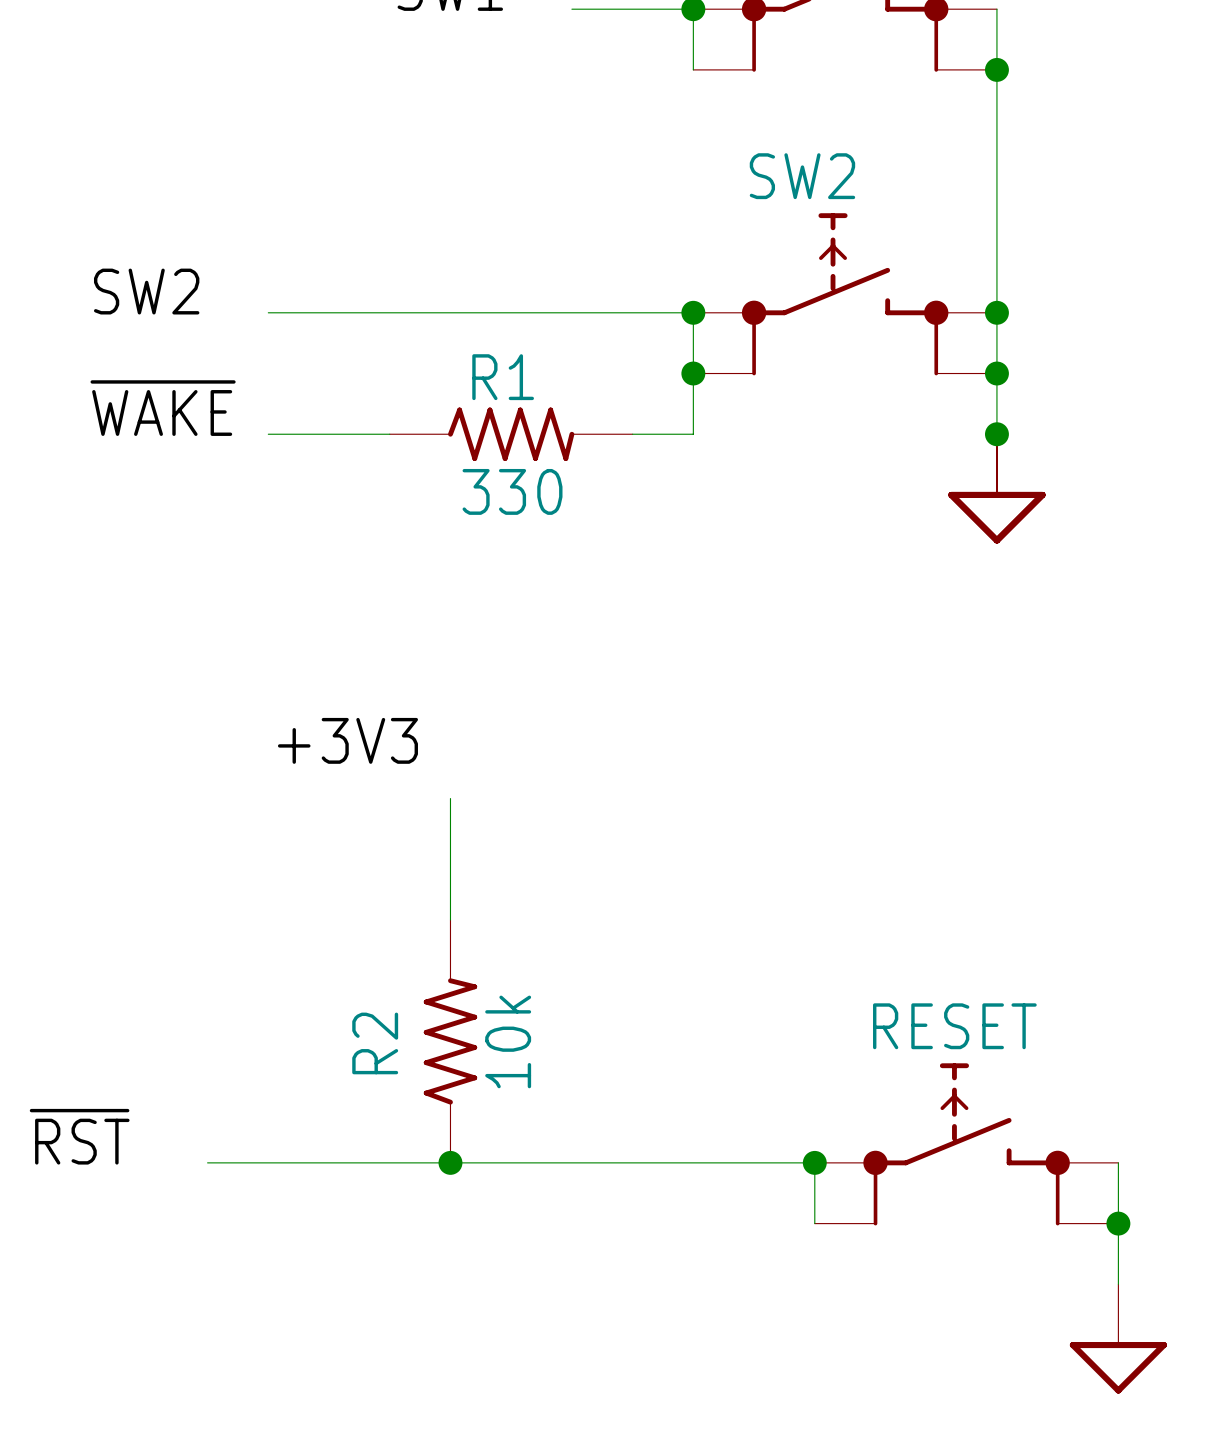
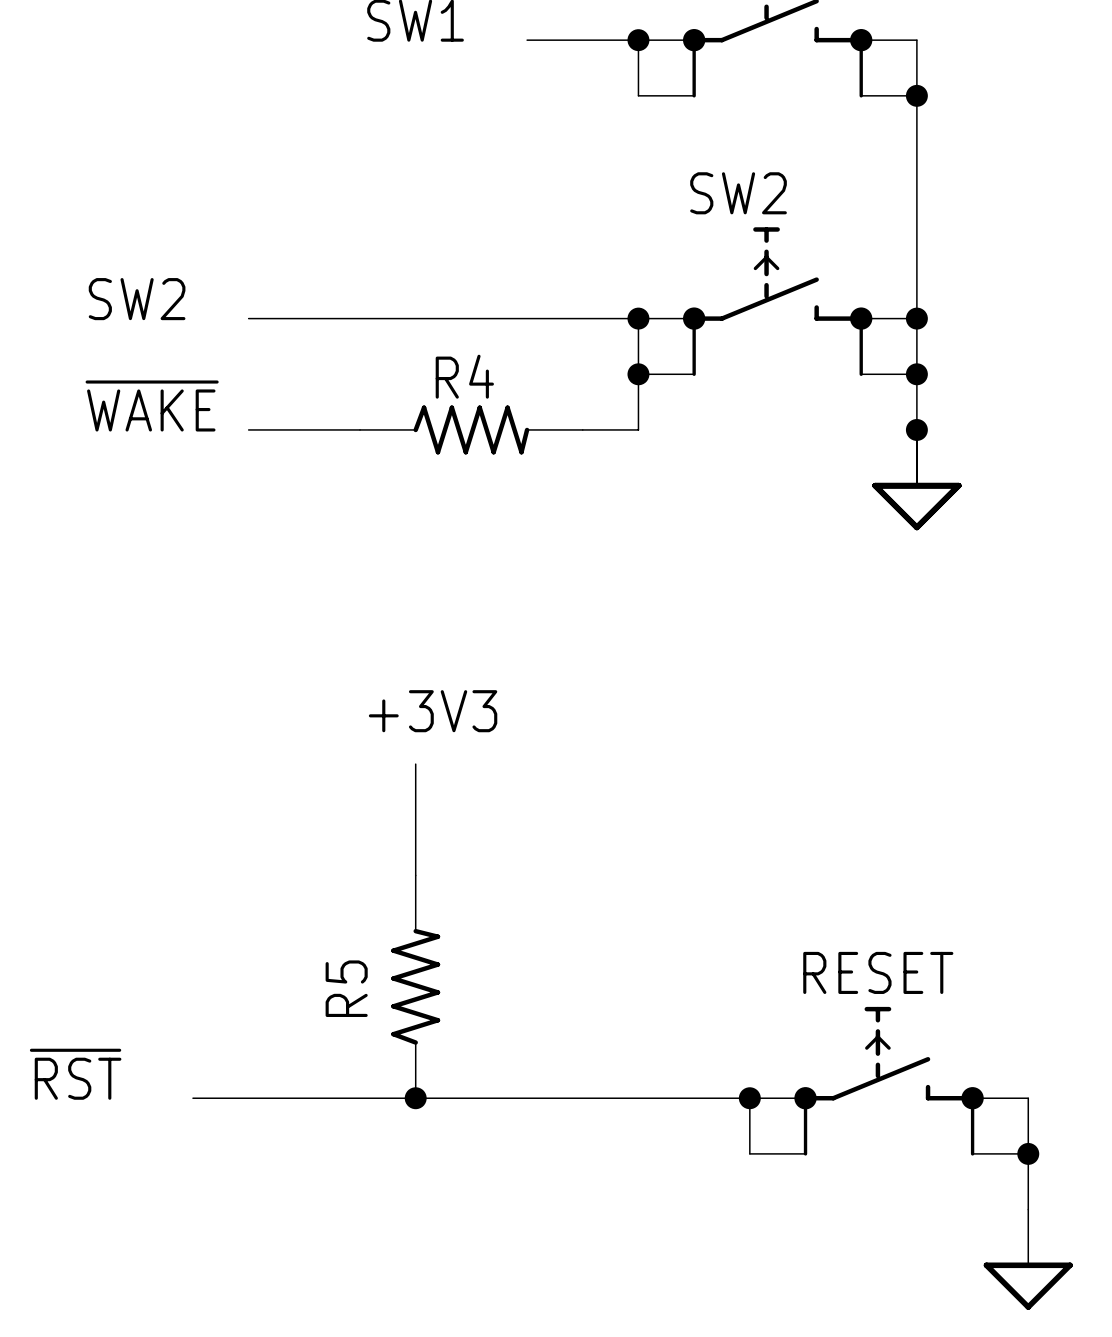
R1 name: R1 (503, 377) -> R4 (464, 376)
R1 value: 330 (512, 491) -> none
label position: +3V3 (347, 740) -> +3V3 (433, 711)
R2 value: 10k (508, 1041) -> none
R2 name: R2 (375, 1043) -> R5 (346, 988)

